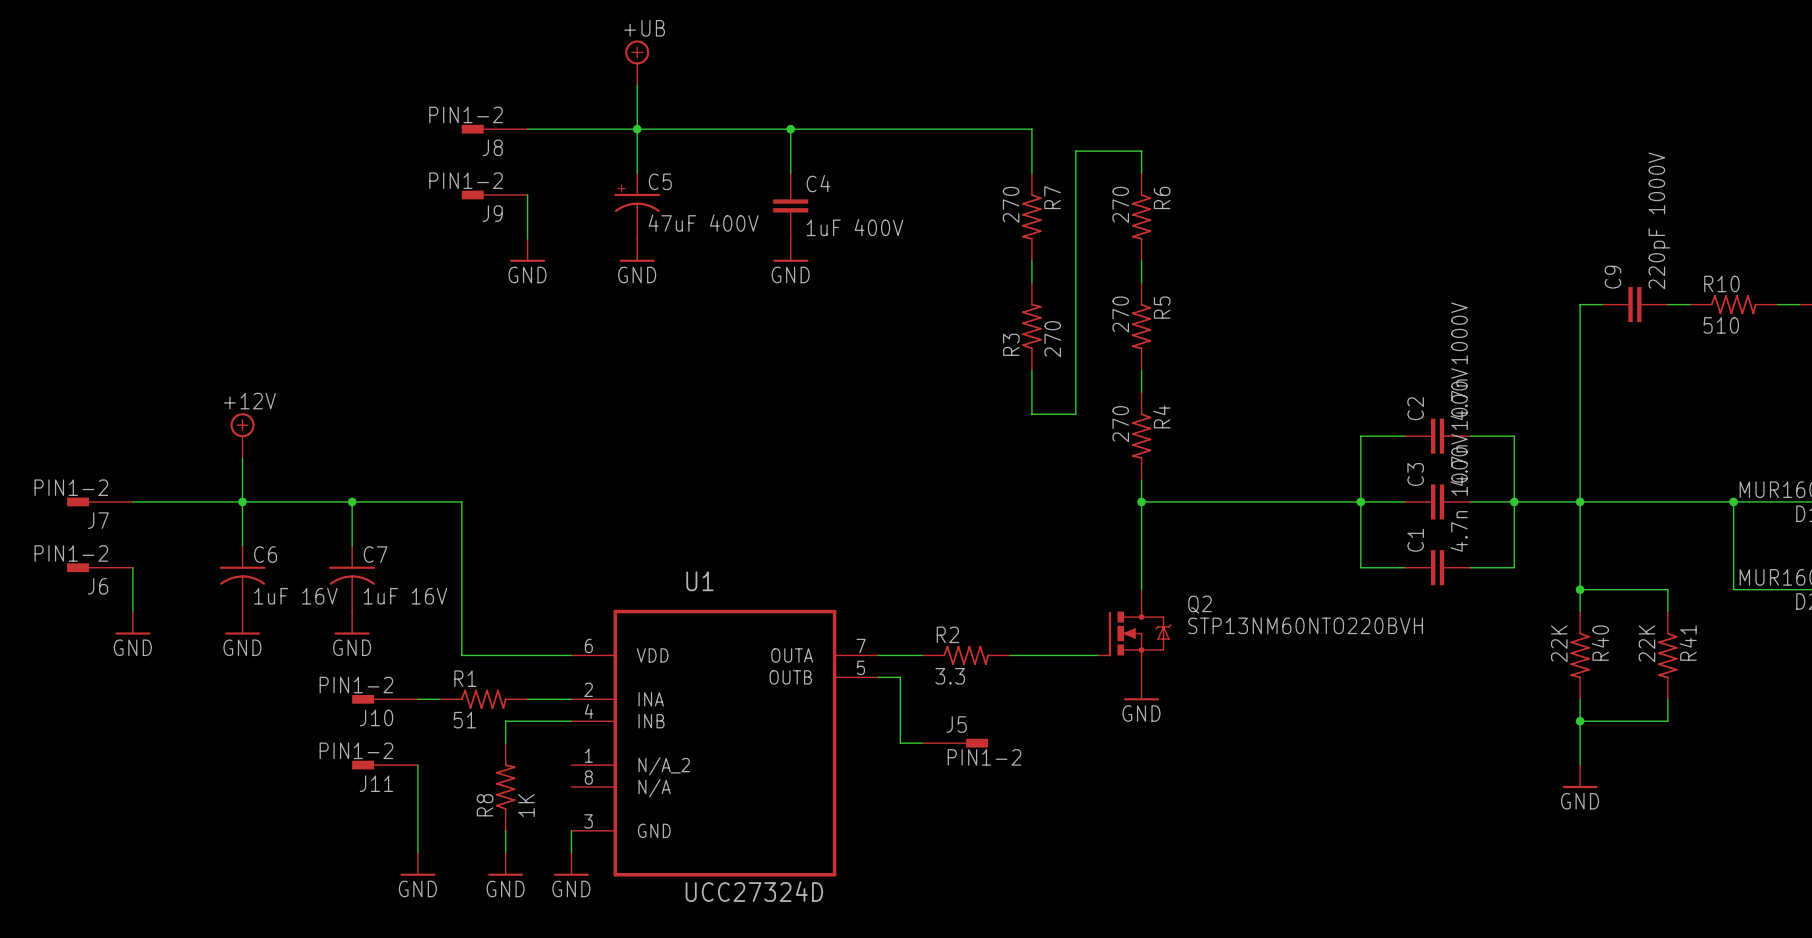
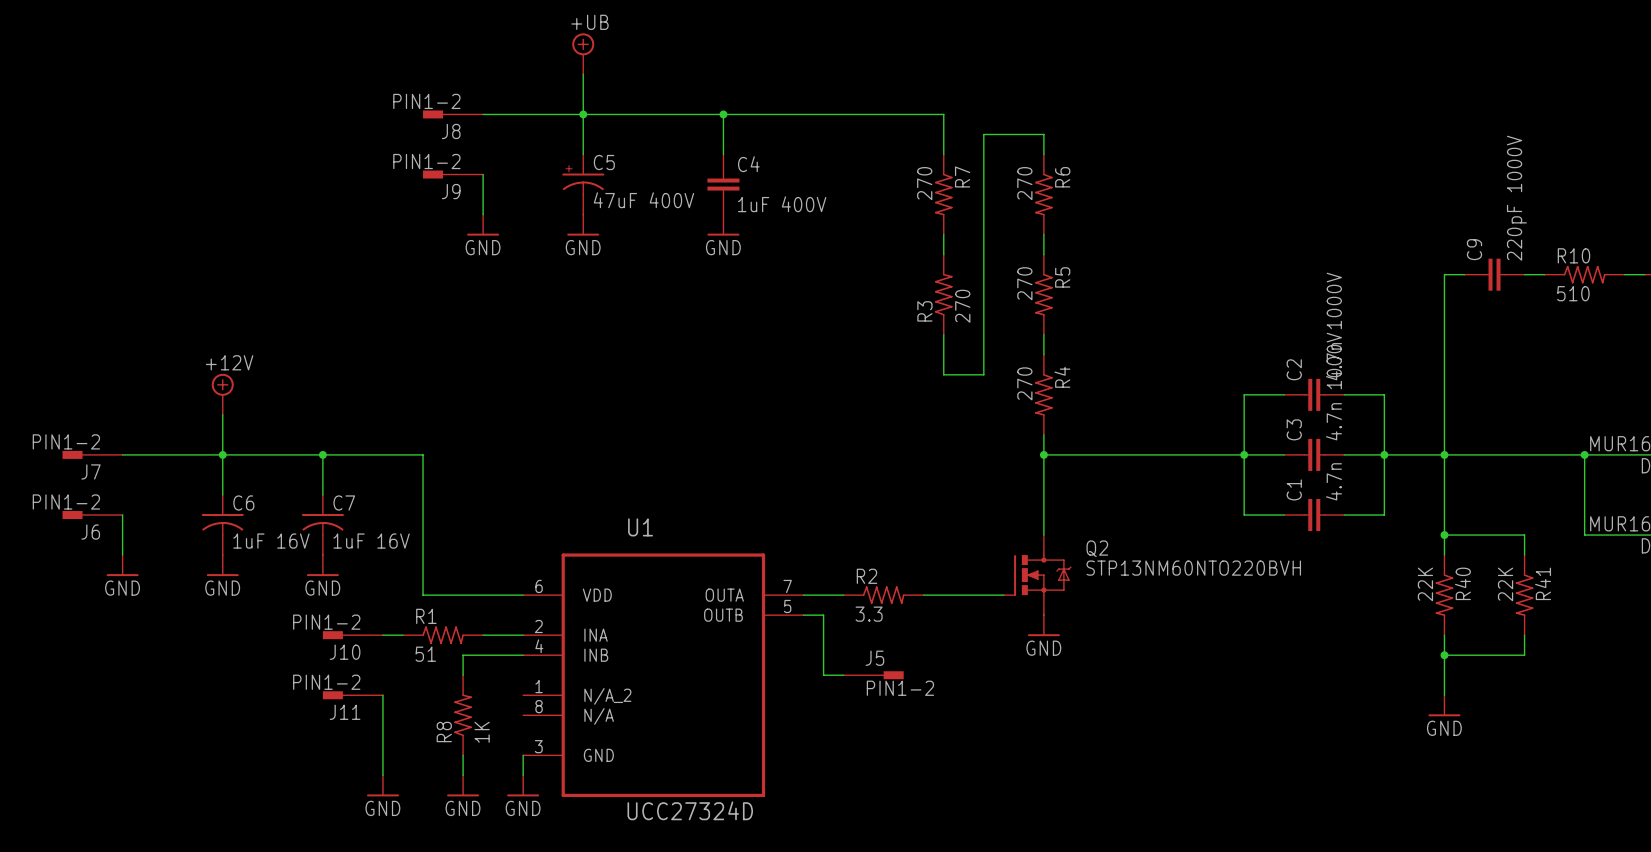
C1 value: 4.7n 1000V (1459, 492) -> 4.7n (1333, 481)

